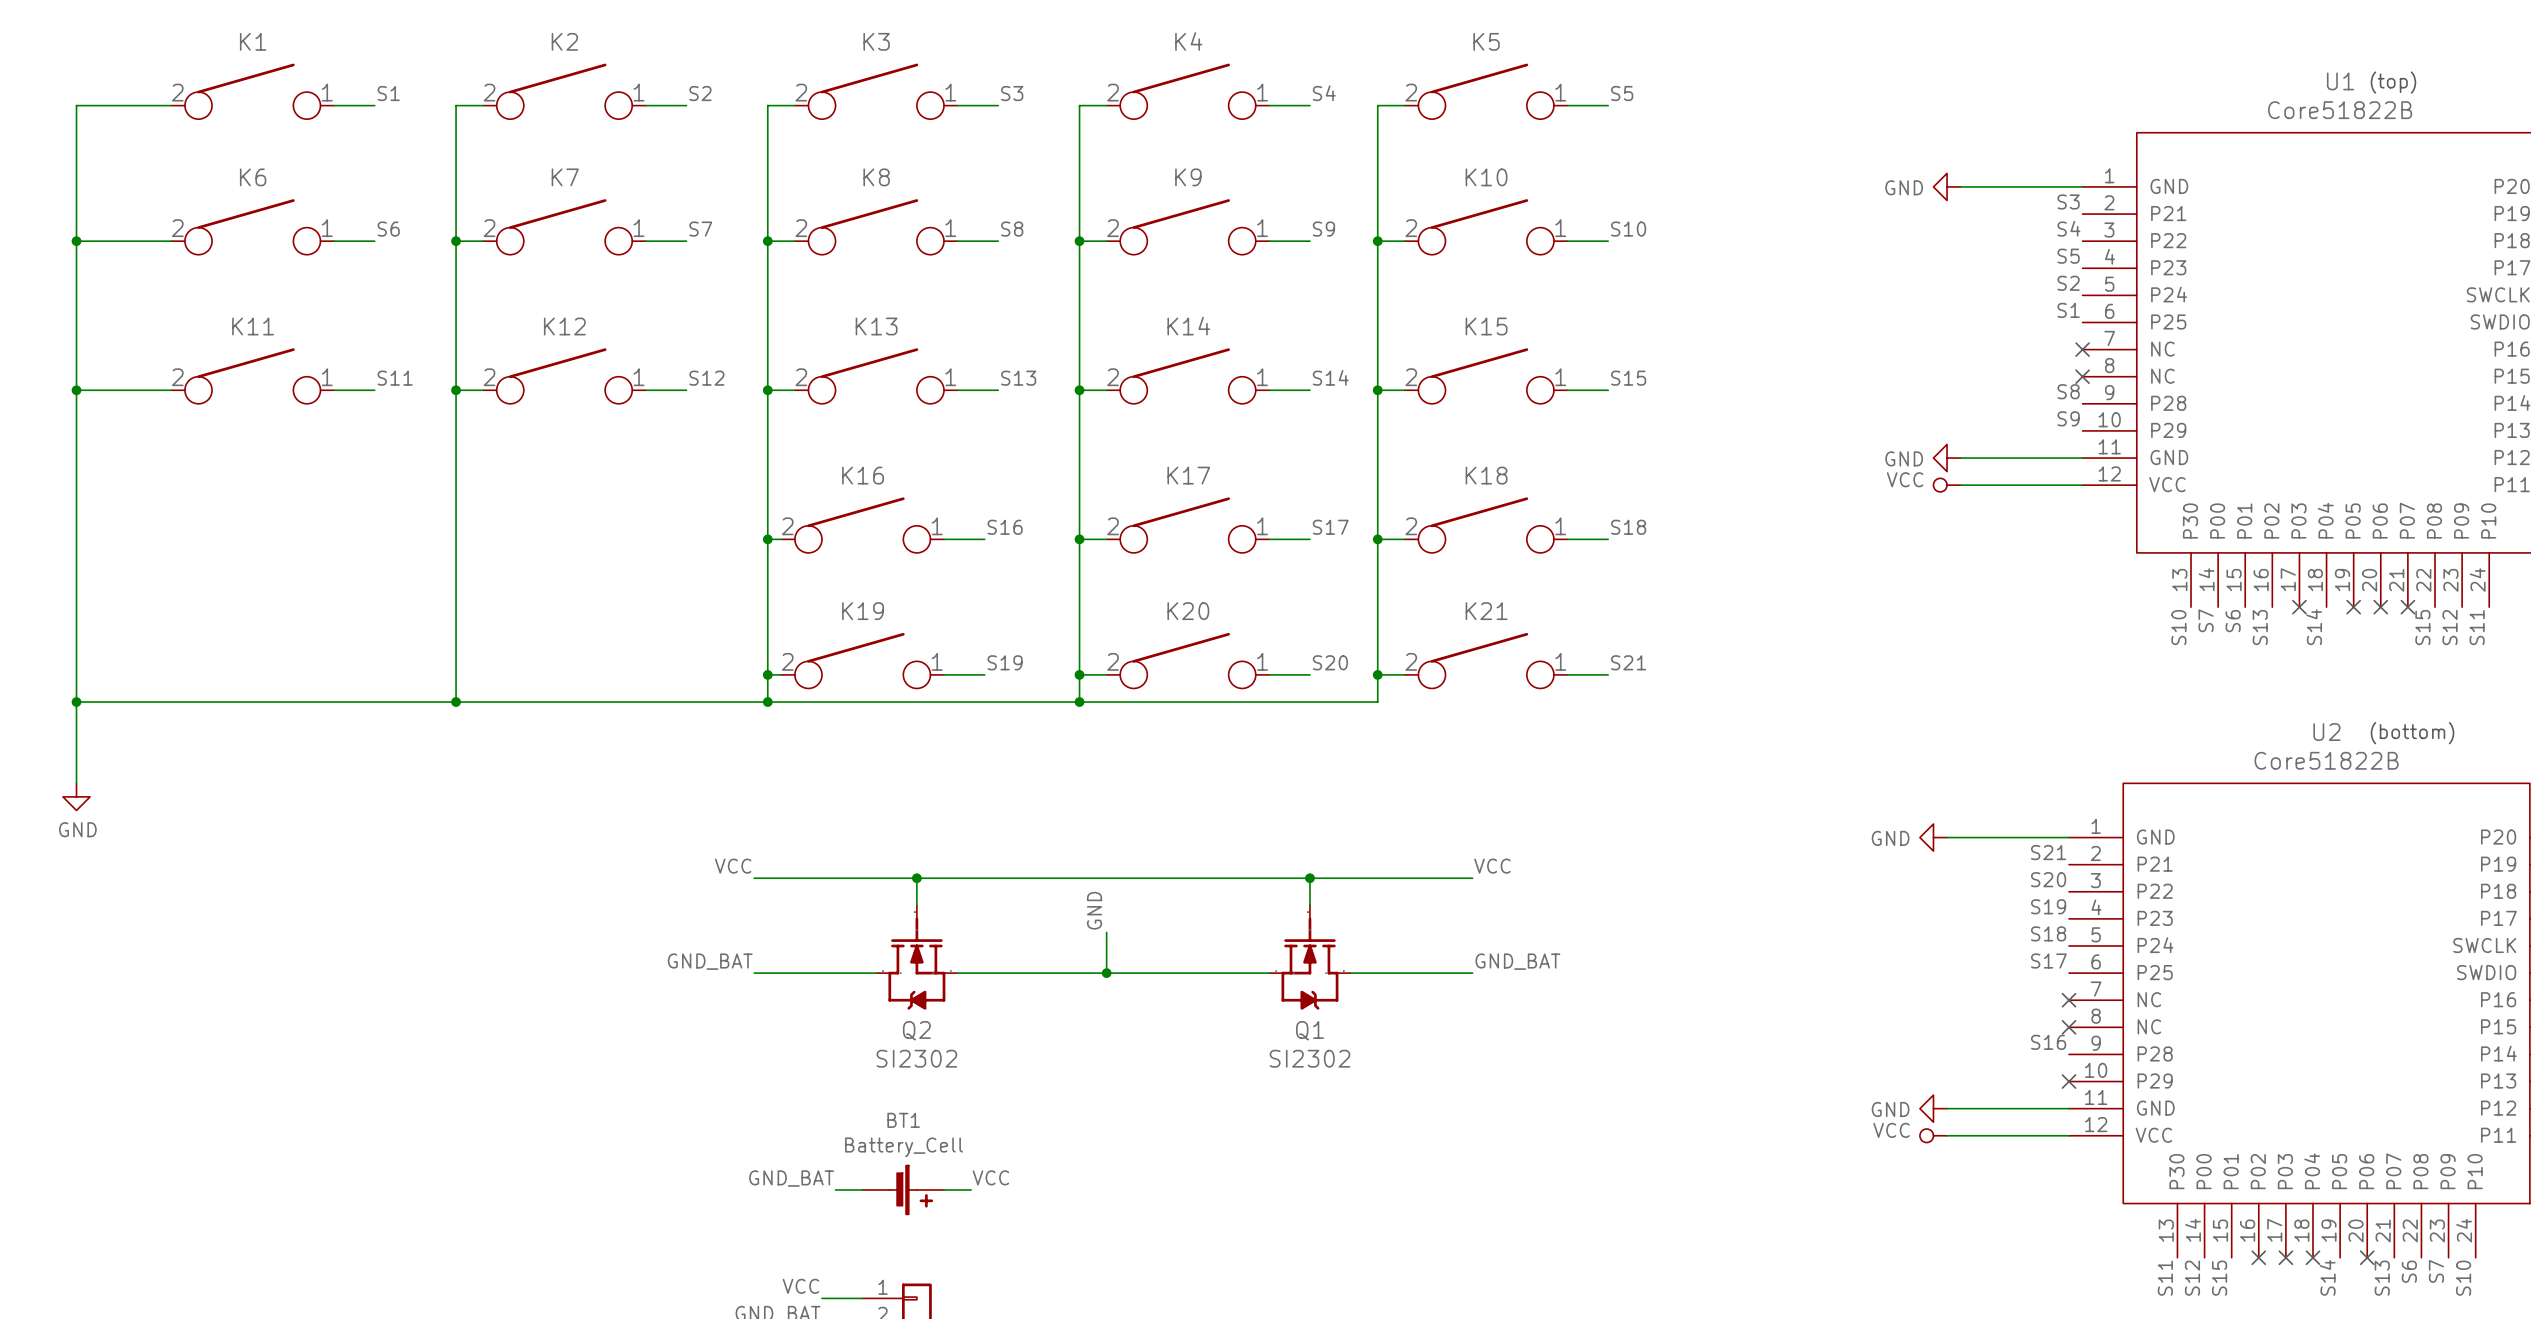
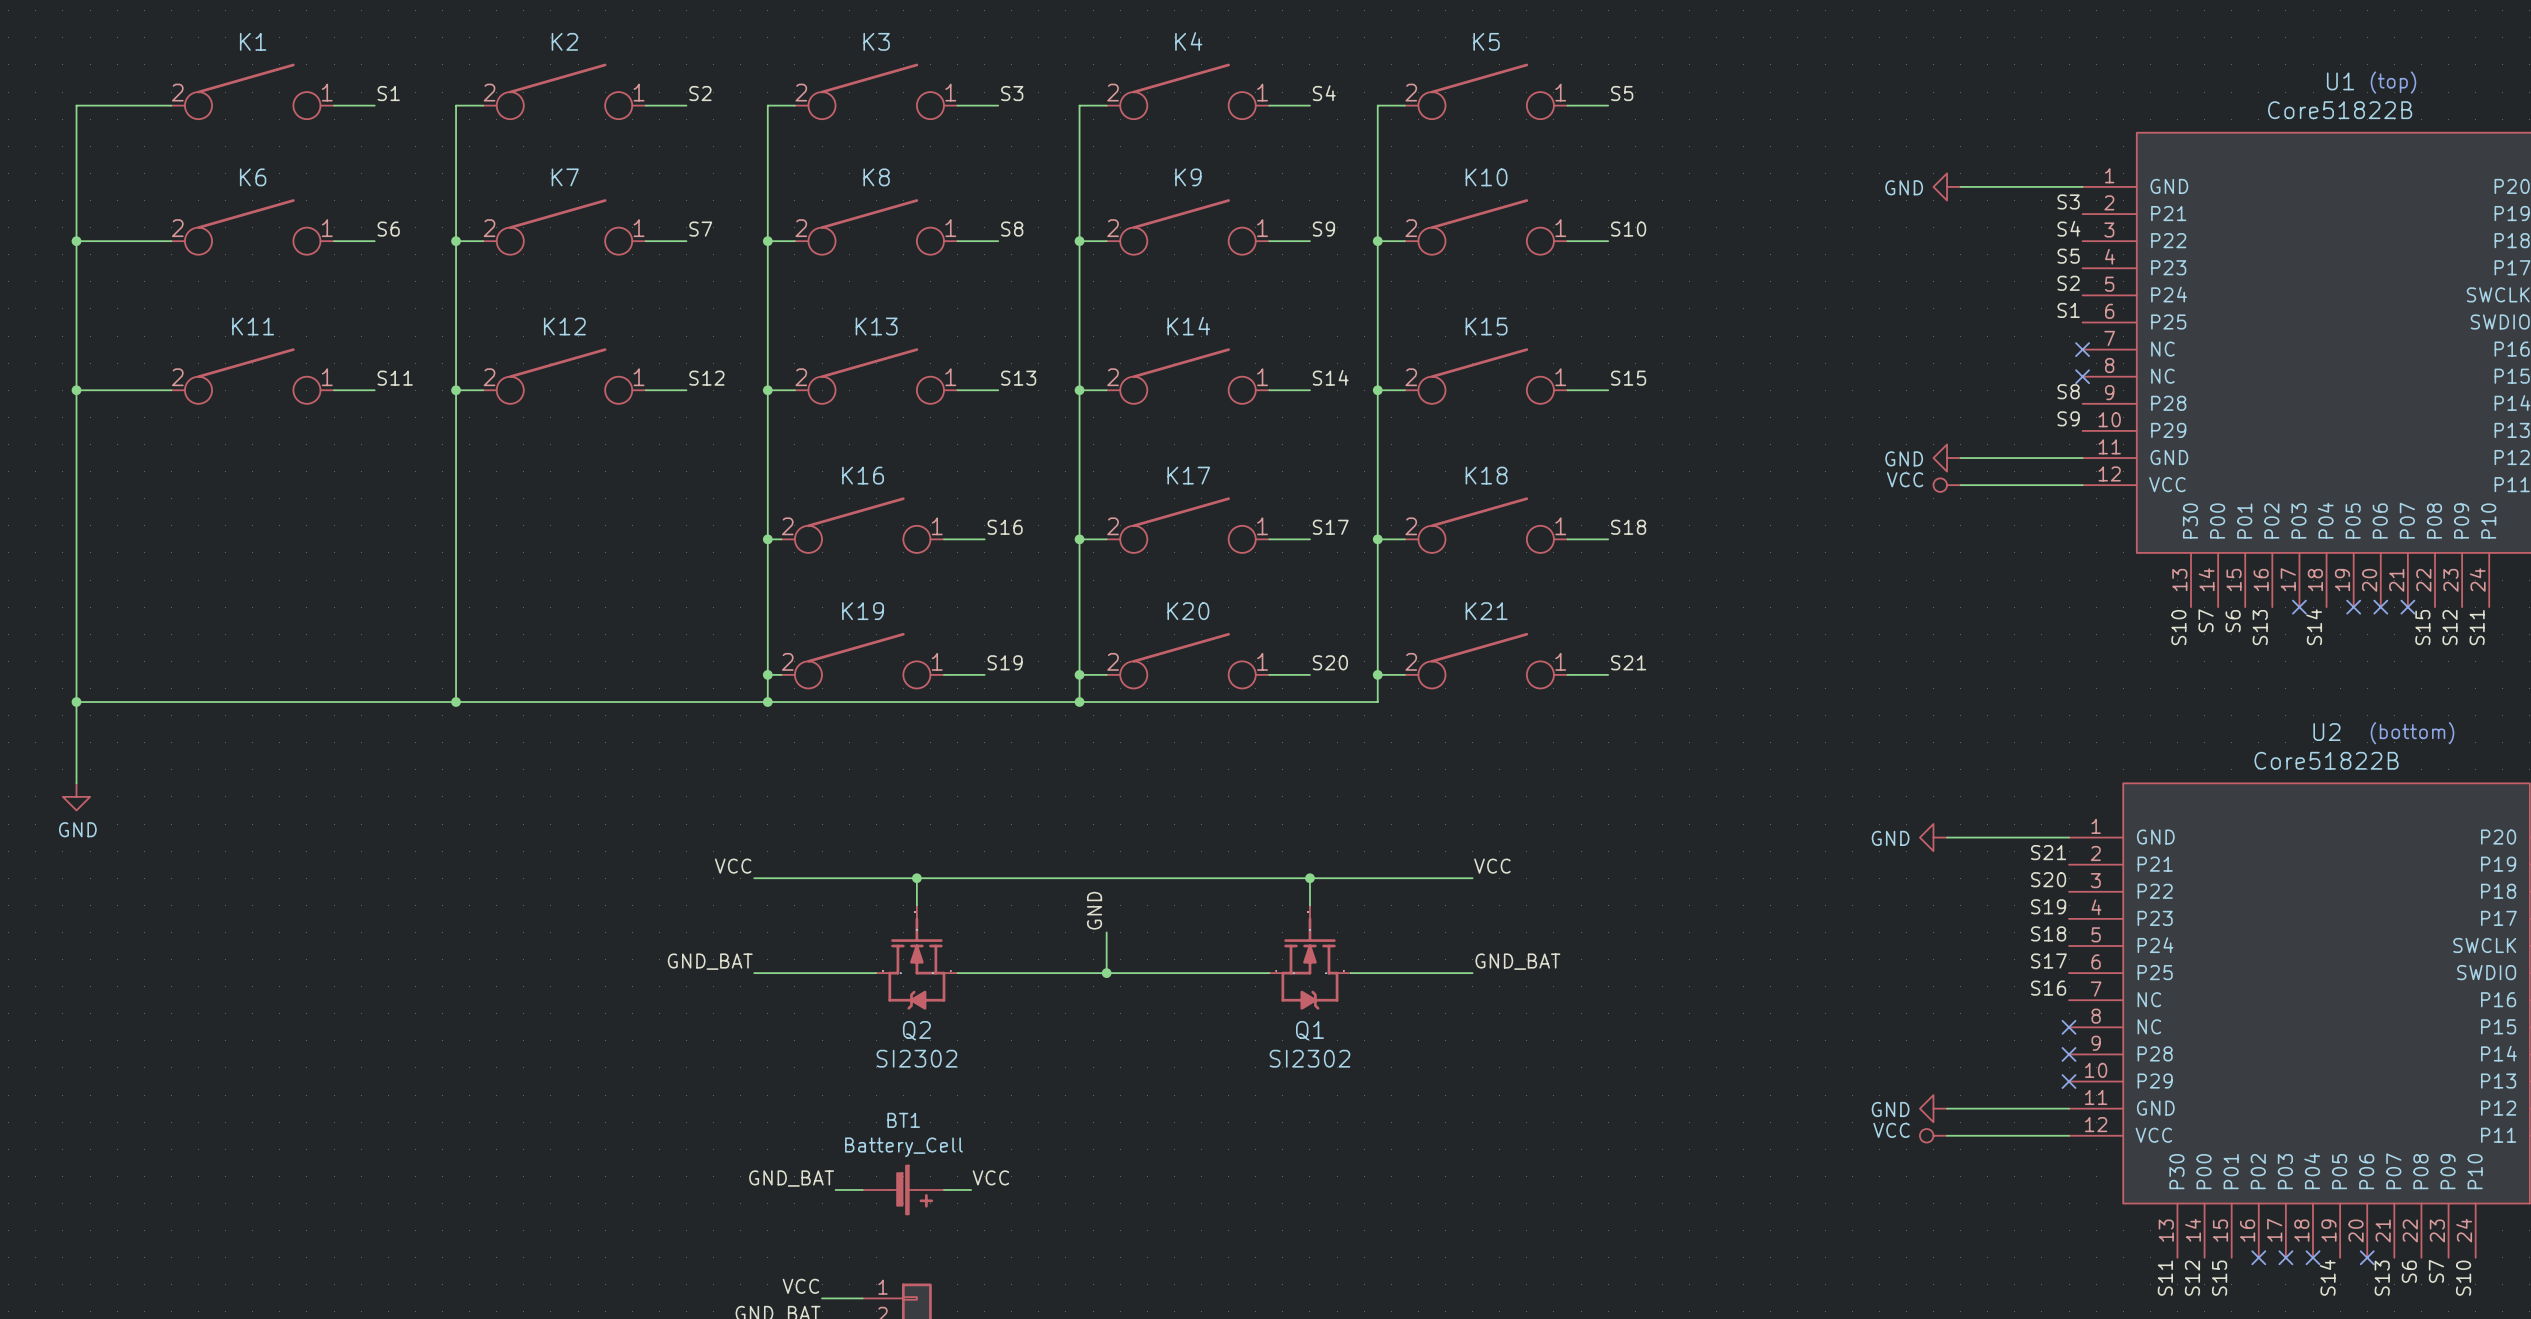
no-connect mark position: (2069, 1000) -> (2069, 1054)
label position: S16 (2048, 1042) -> S16 (2048, 988)

